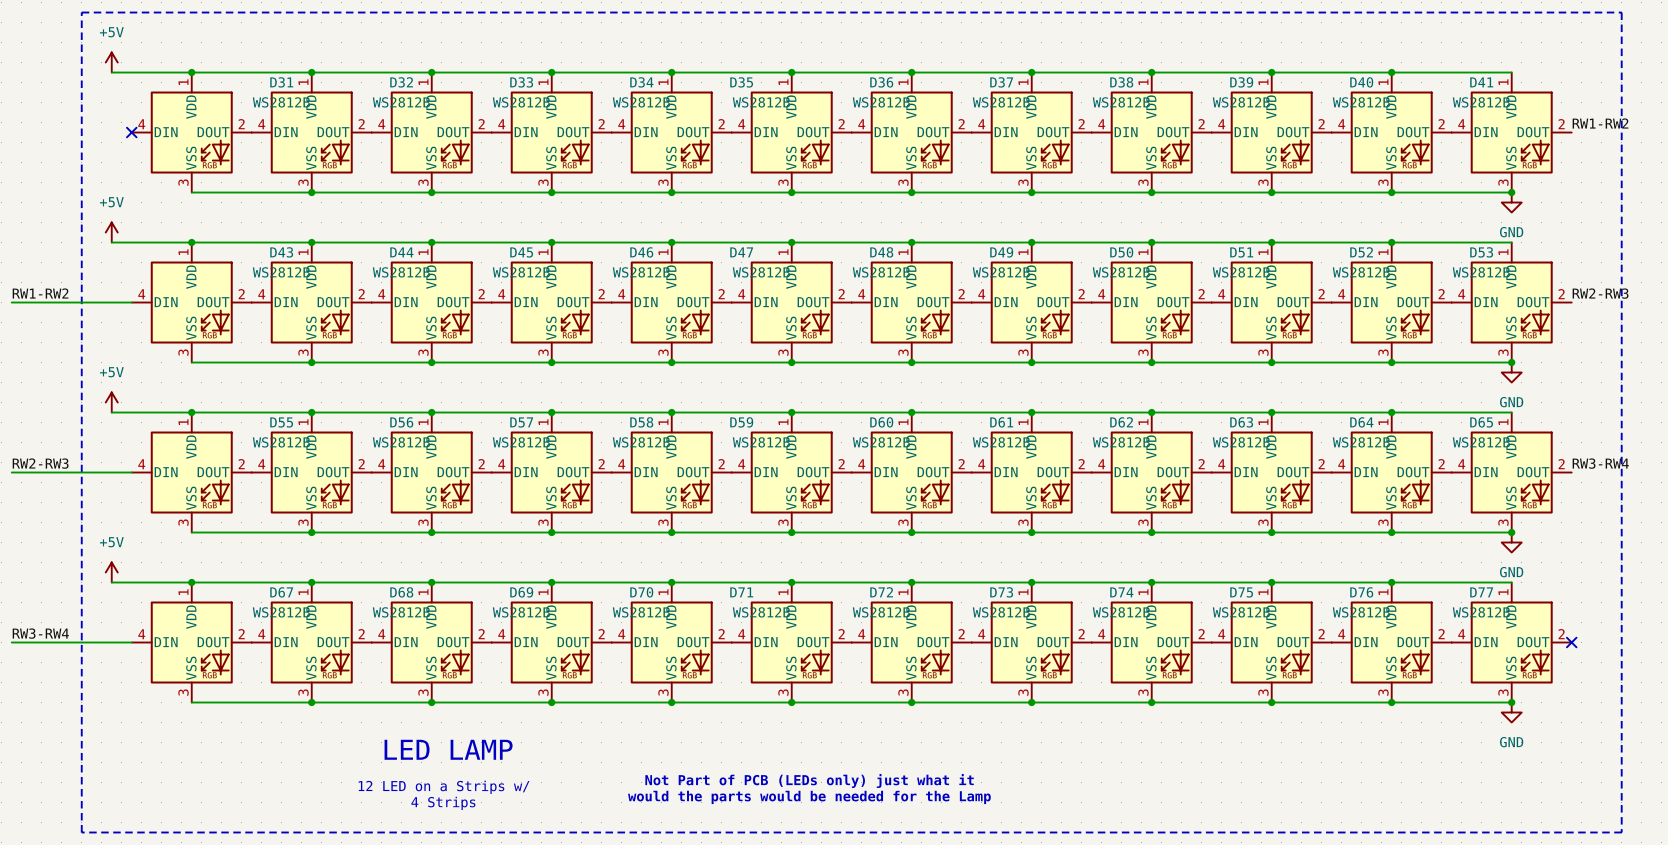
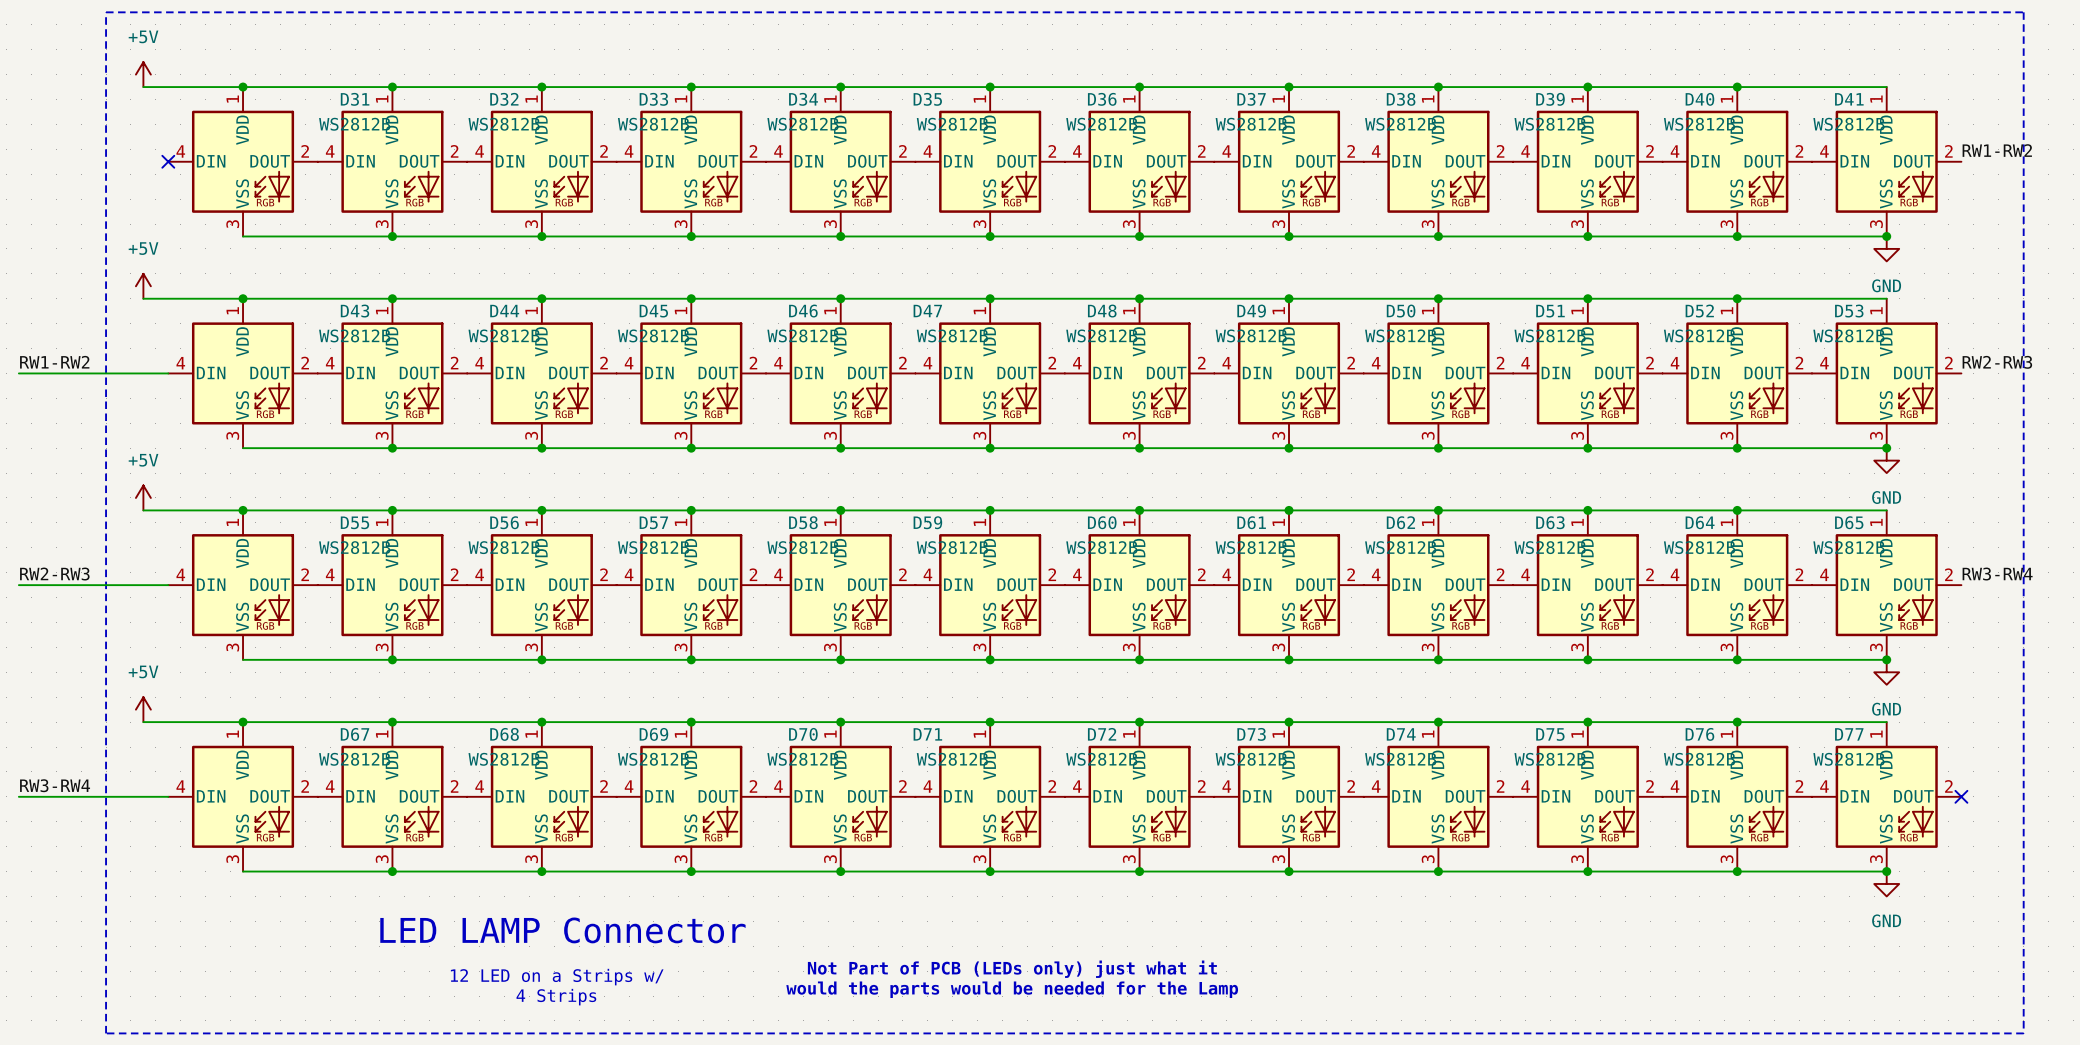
text: LED LAMP (448, 749) -> LED LAMP Connector (562, 930)

